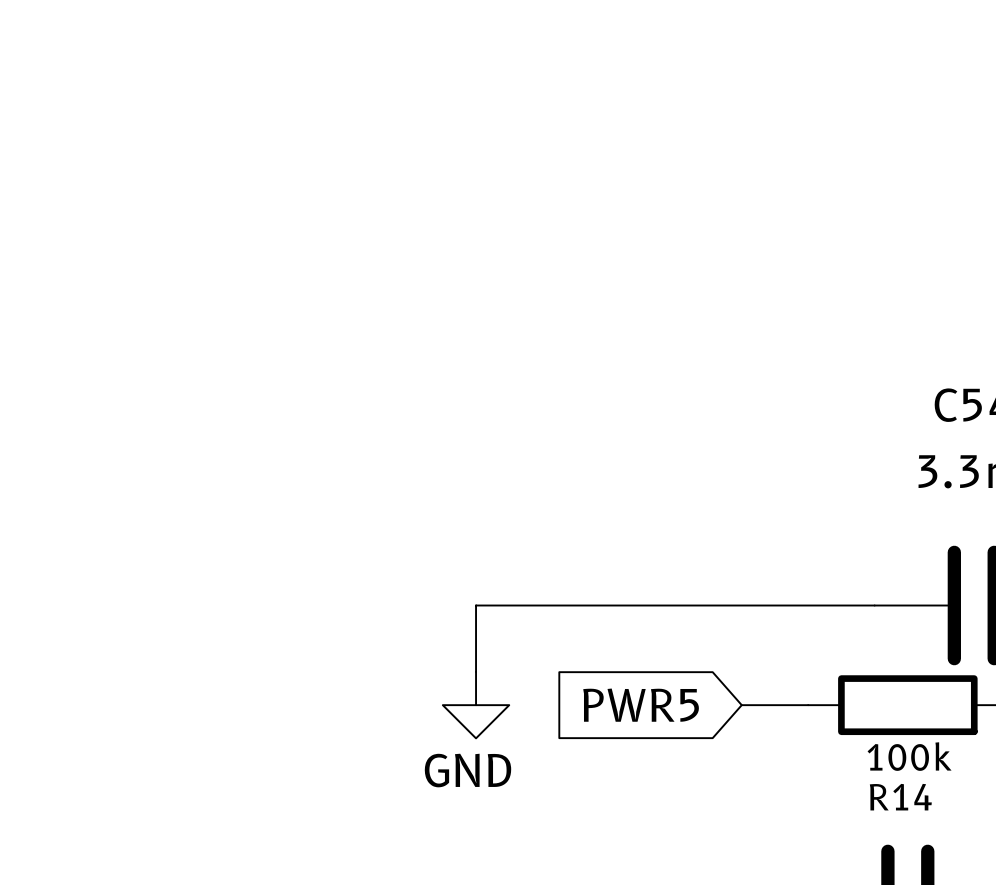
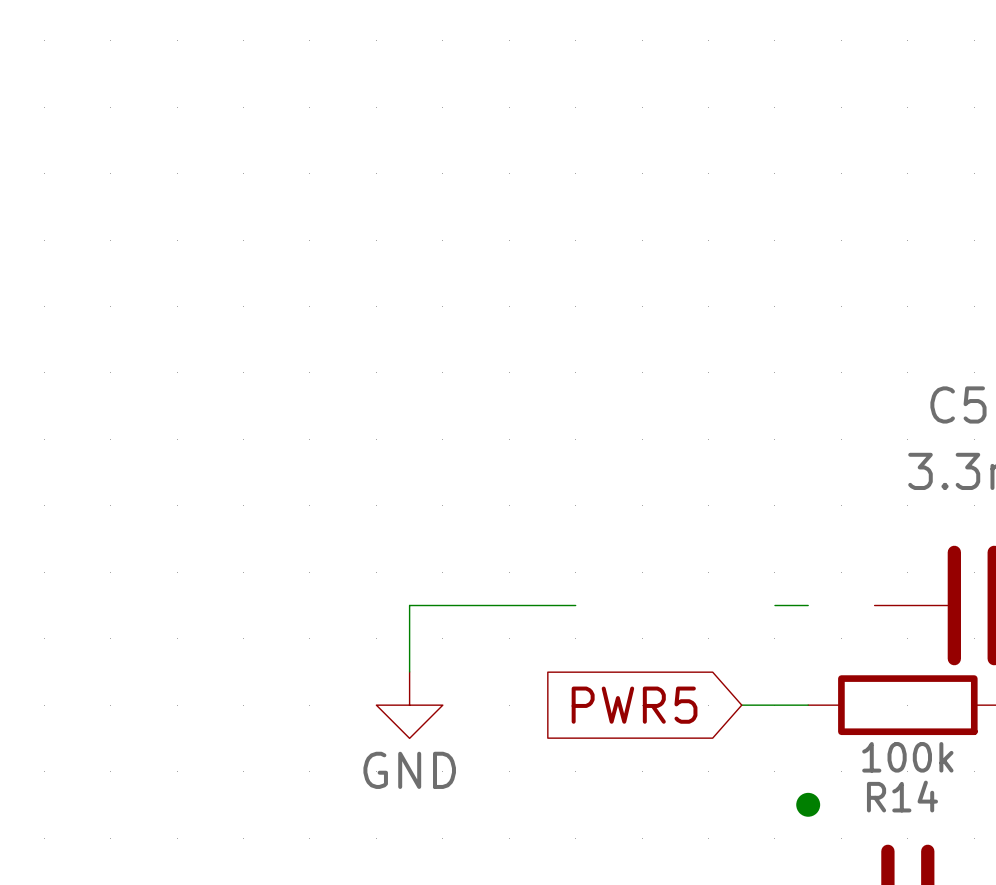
wire: (476, 605) (476, 671) -> (476, 605) (409, 605) (409, 671)
wire: (575, 605) (774, 605) -> none
wire: (808, 605) (874, 605) -> none
power symbol position: GND (476, 705) -> GND (409, 705)
junction: none -> (808, 804)

